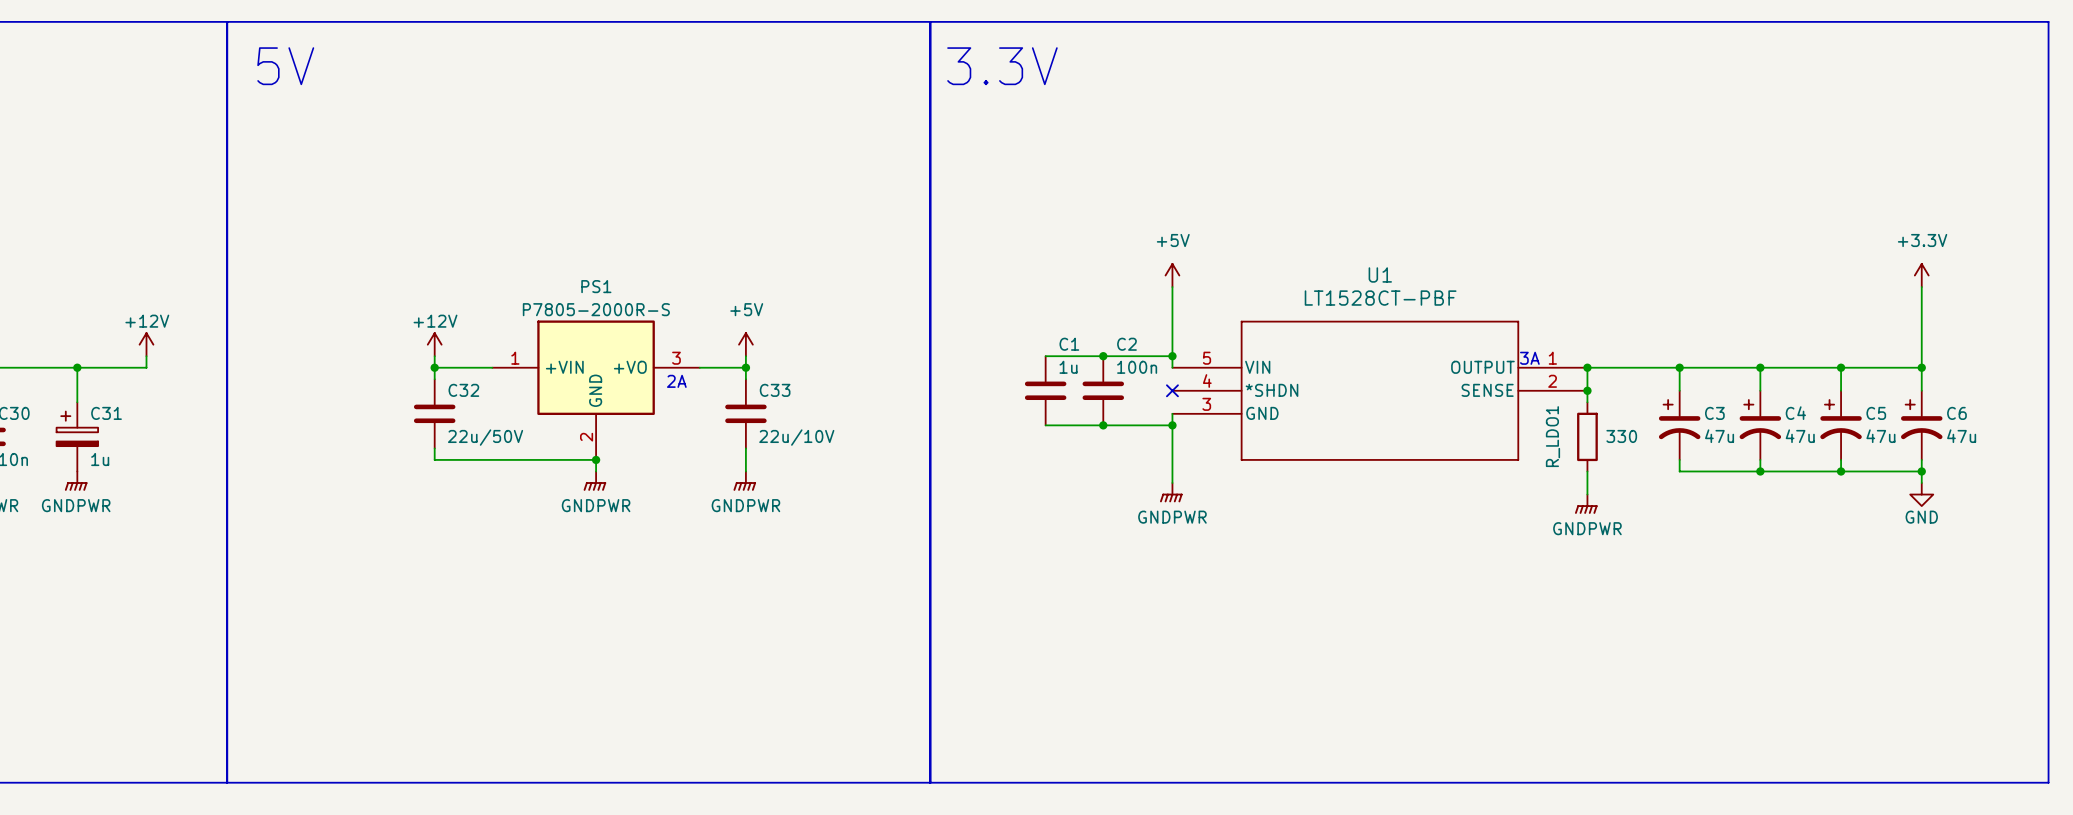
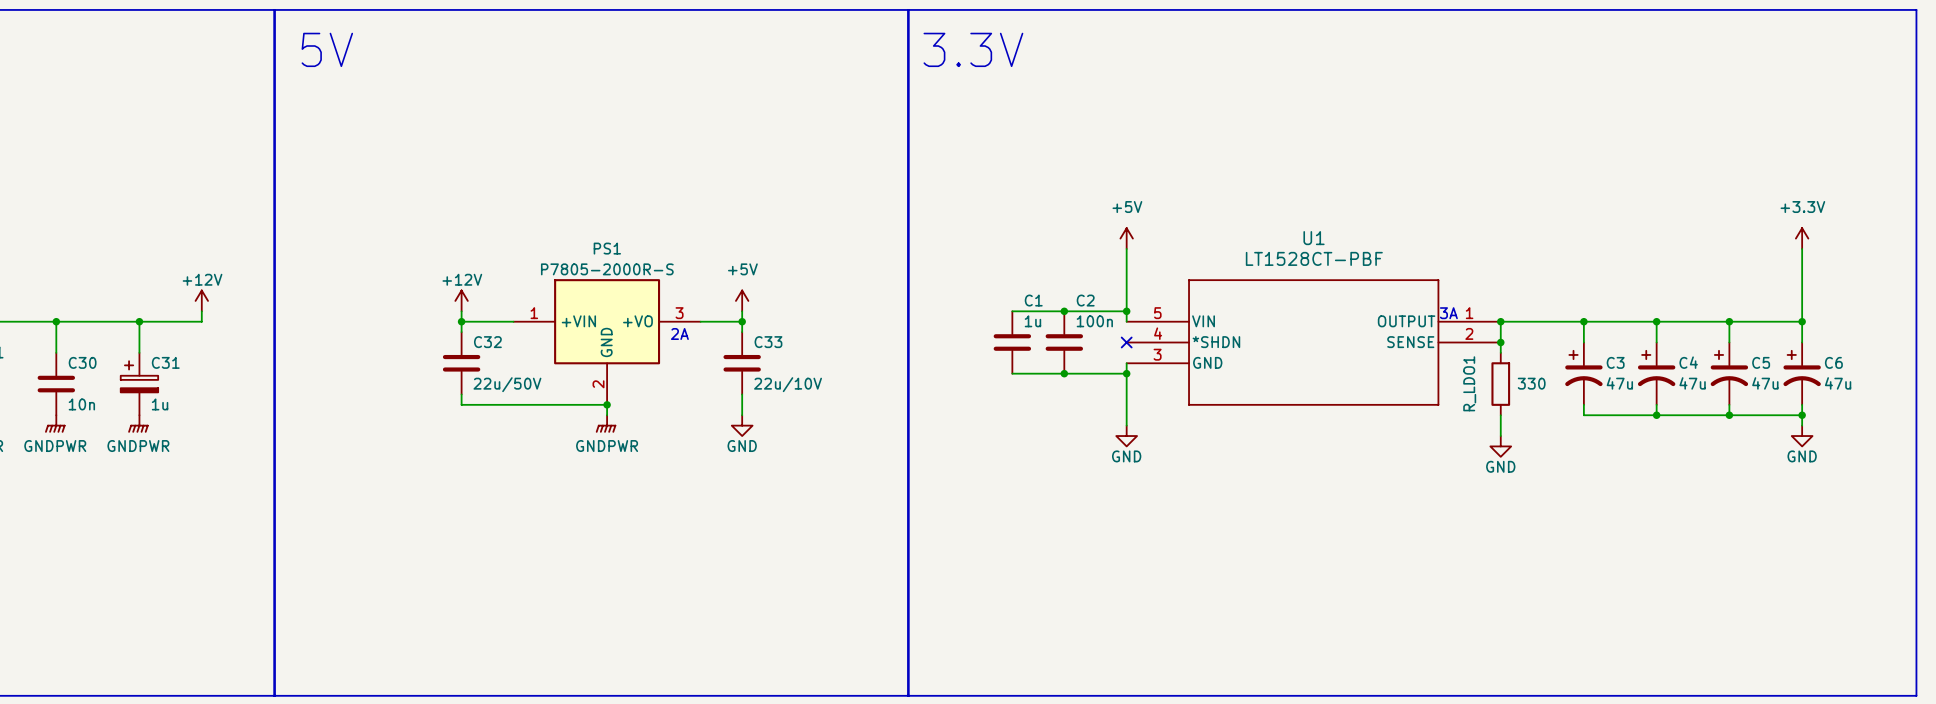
power symbol: GNDPWR (744, 481) -> GND (742, 425)
power symbol: GNDPWR (1171, 492) -> GND (1126, 436)
power symbol: GNDPWR (1586, 504) -> GND (1500, 446)

